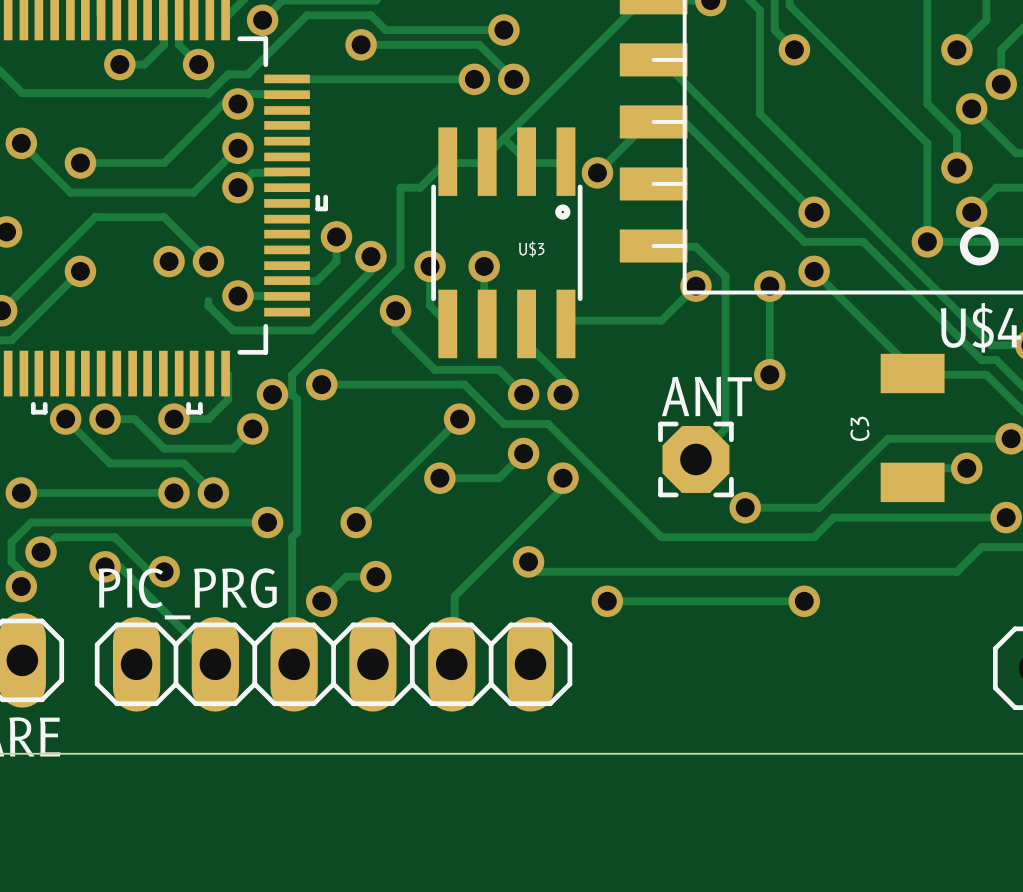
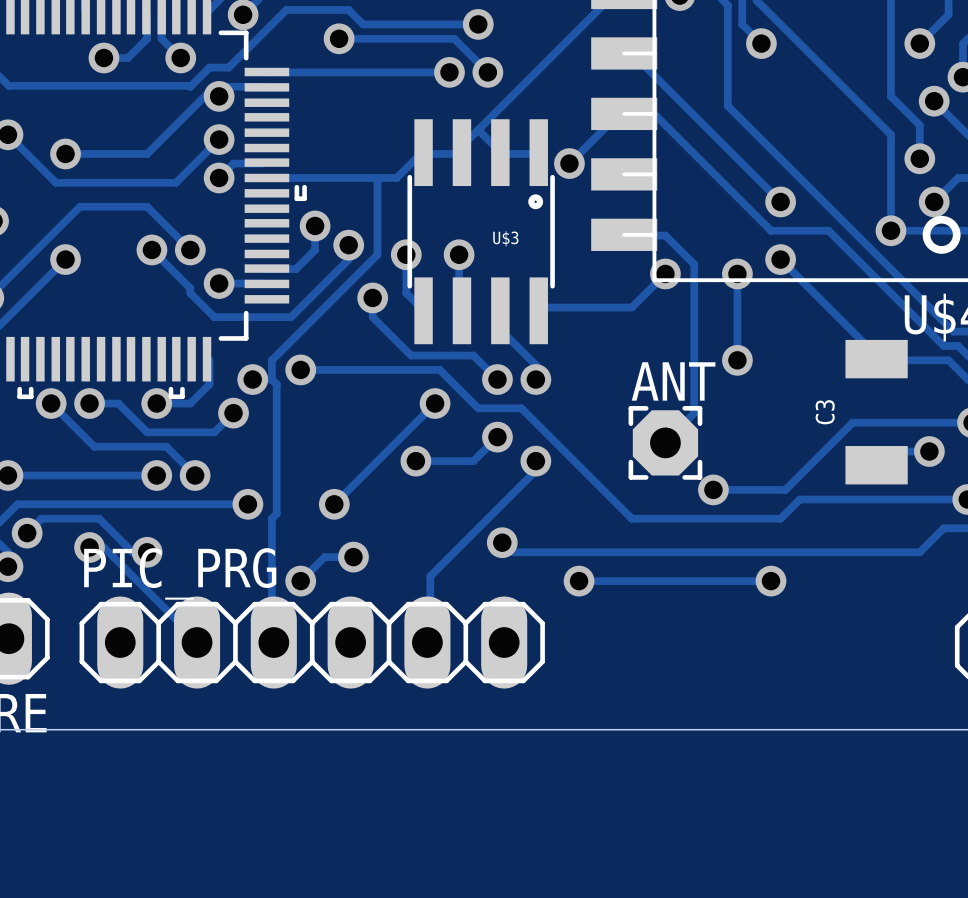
track: none -> (266, 177) (377, 177)
track: none -> (151, 249) (190, 288)

